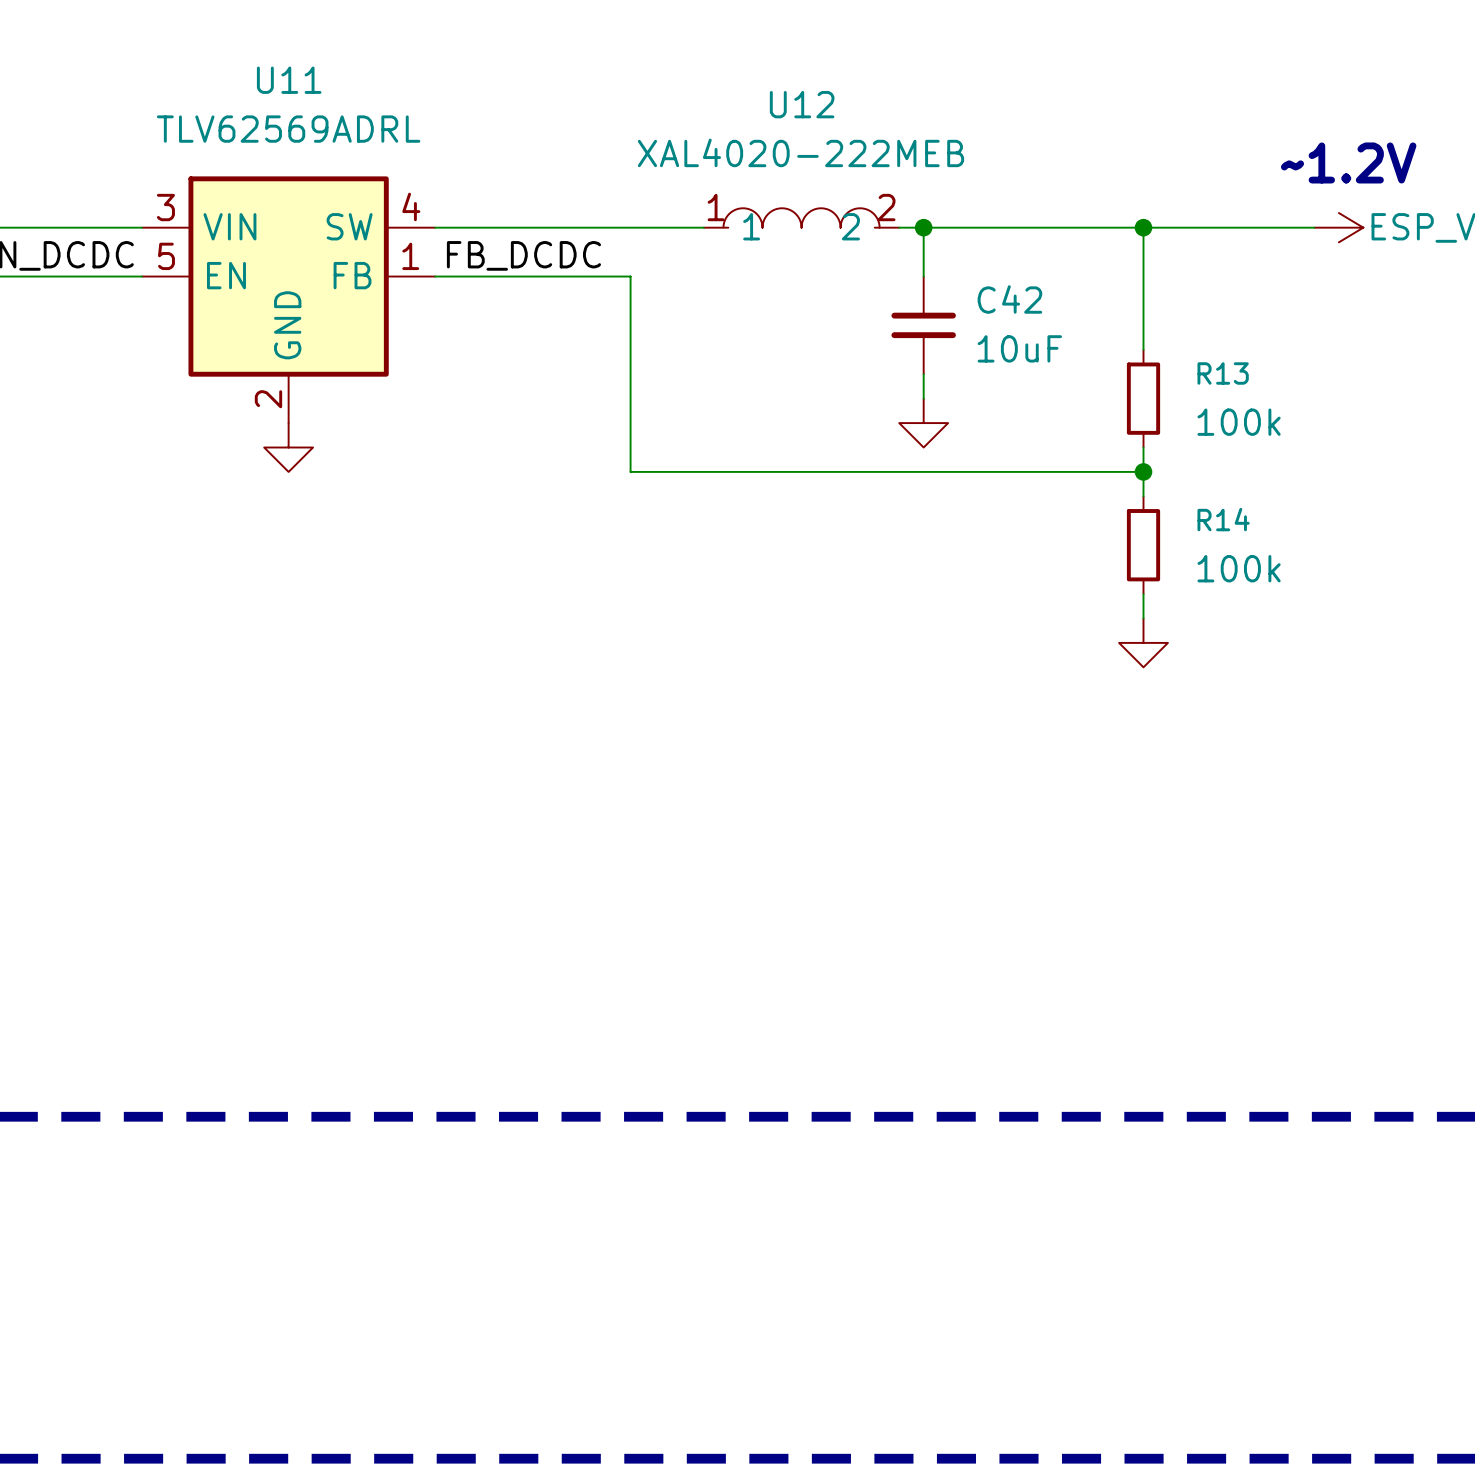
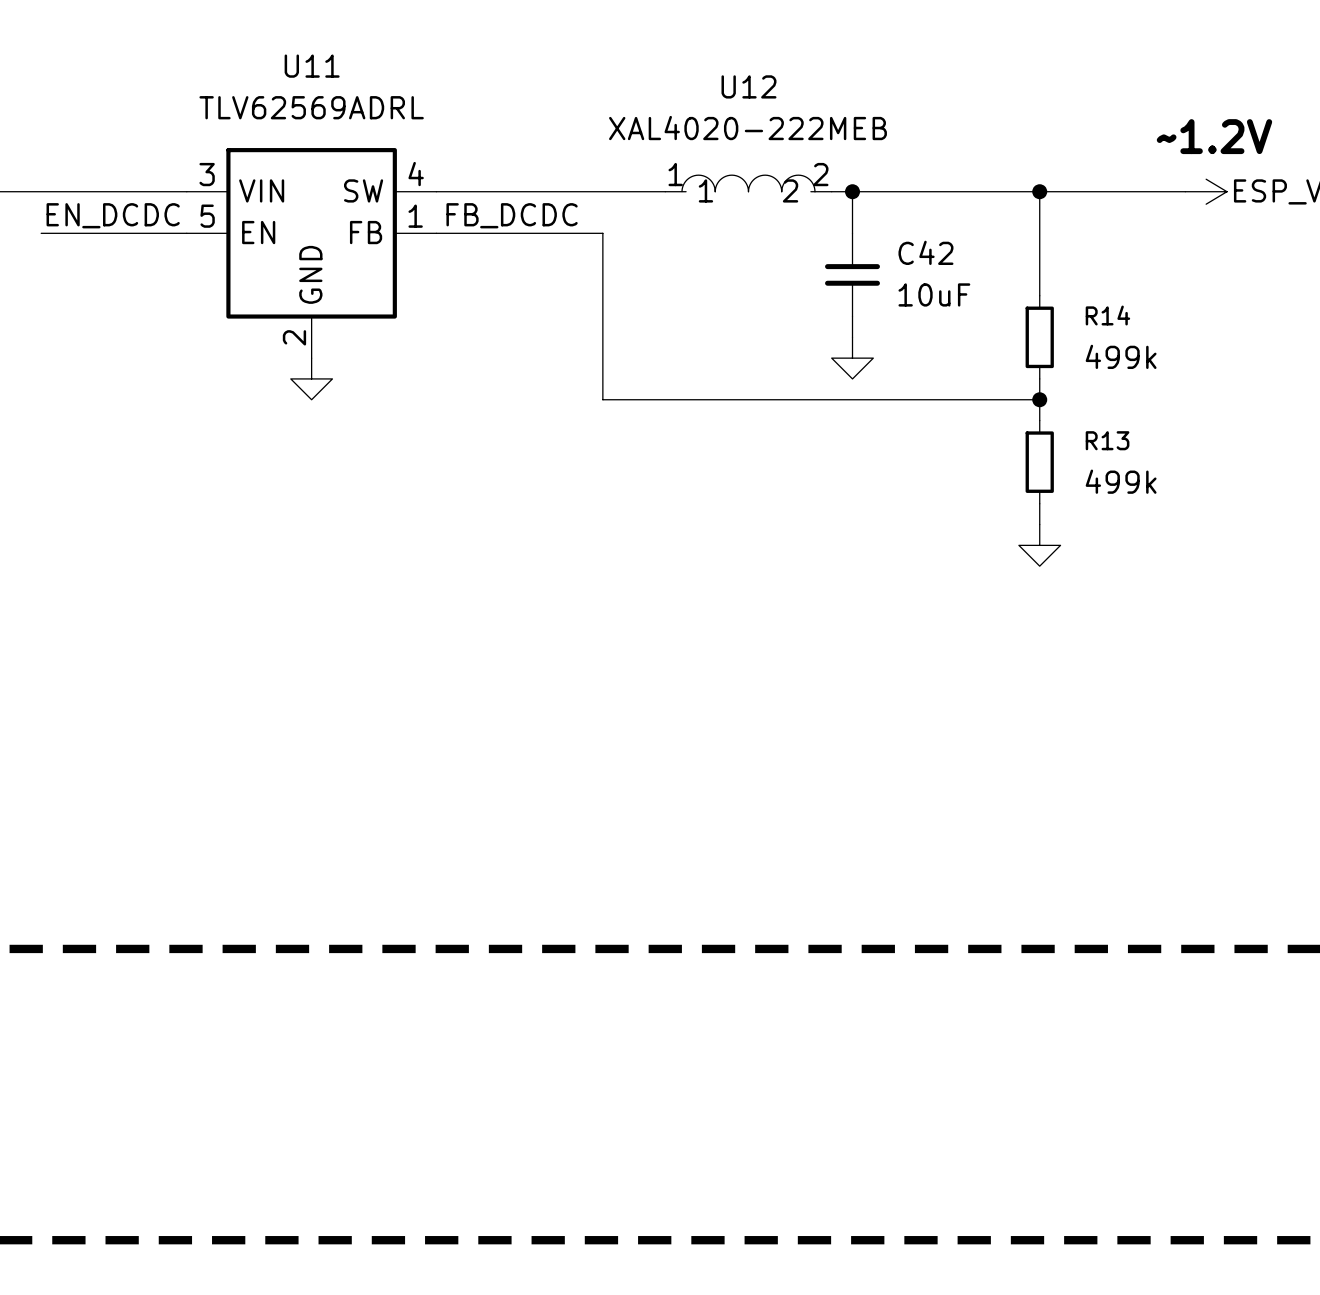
R13 name: R13 (1223, 373) -> R14 (1107, 315)
R13 value: 100k (1239, 422) -> 499k (1121, 356)
R14 name: R14 (1223, 519) -> R13 (1107, 440)
R14 value: 100k (1239, 568) -> 499k (1121, 481)

